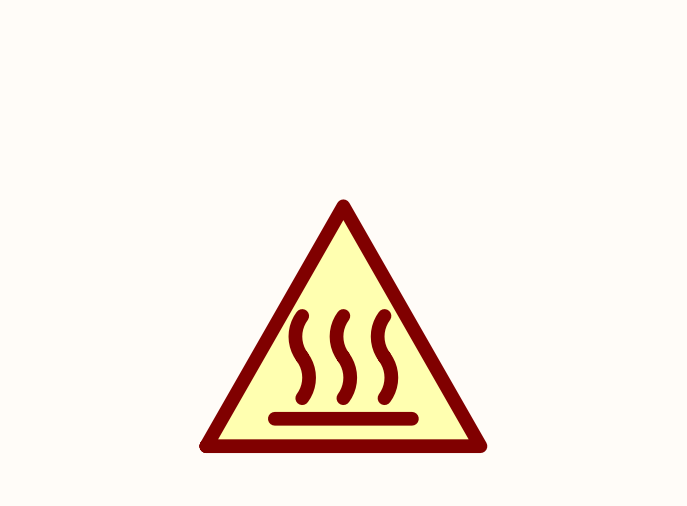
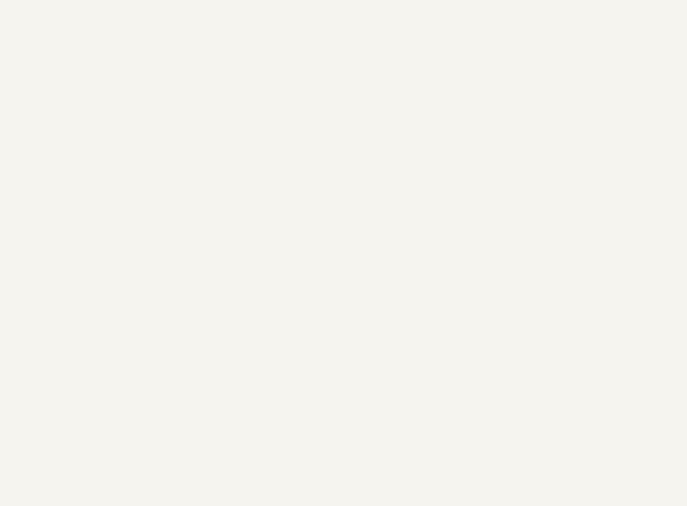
part: (343, 326) -> none

